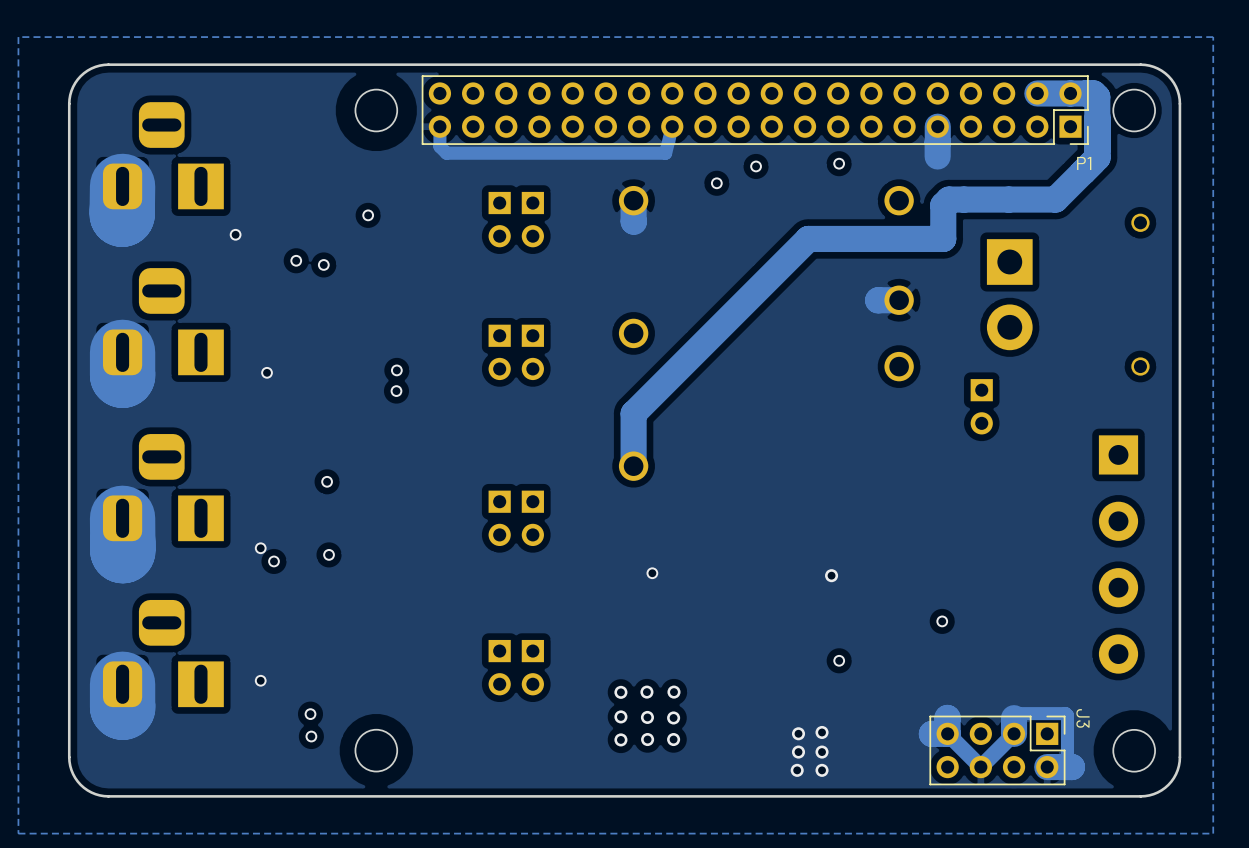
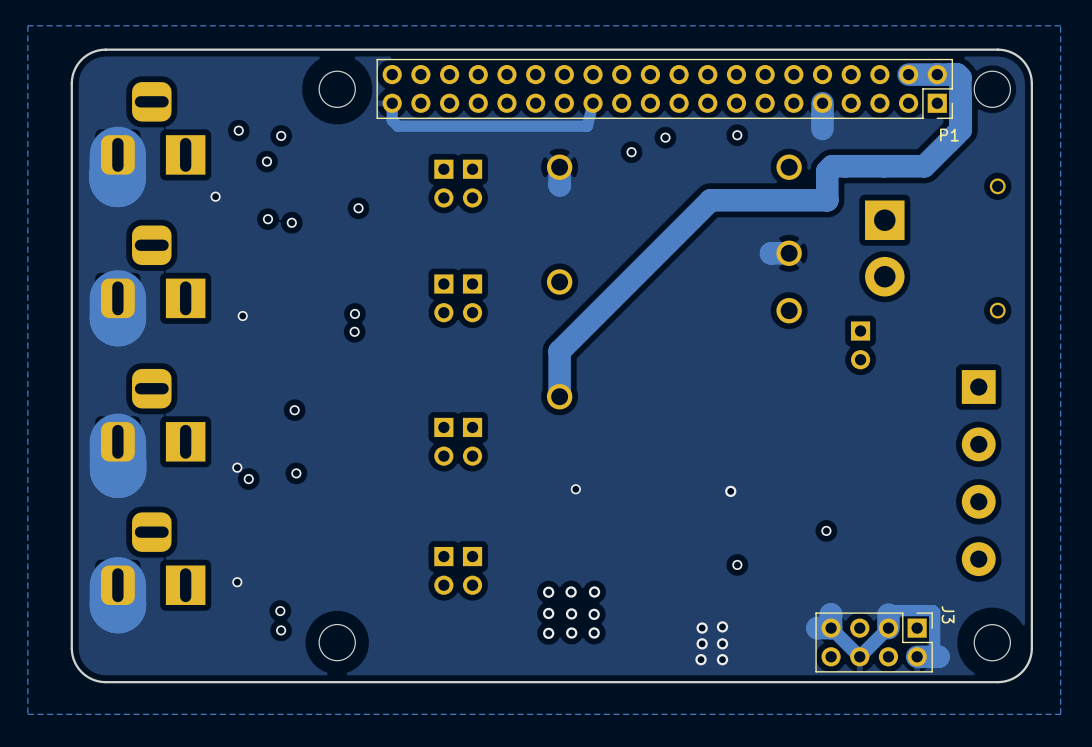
via: none -> (238, 130)
via: none -> (281, 135)
via: none -> (266, 161)
via: (368, 215) -> none
via: none -> (358, 208)

